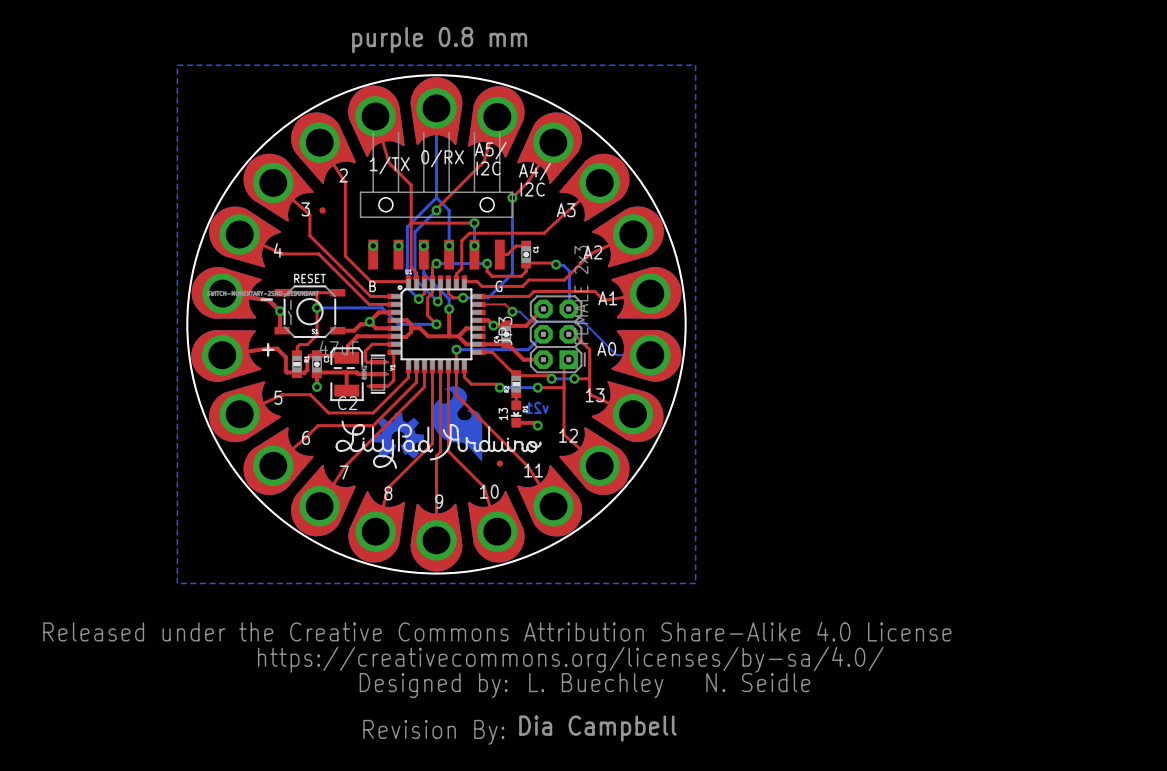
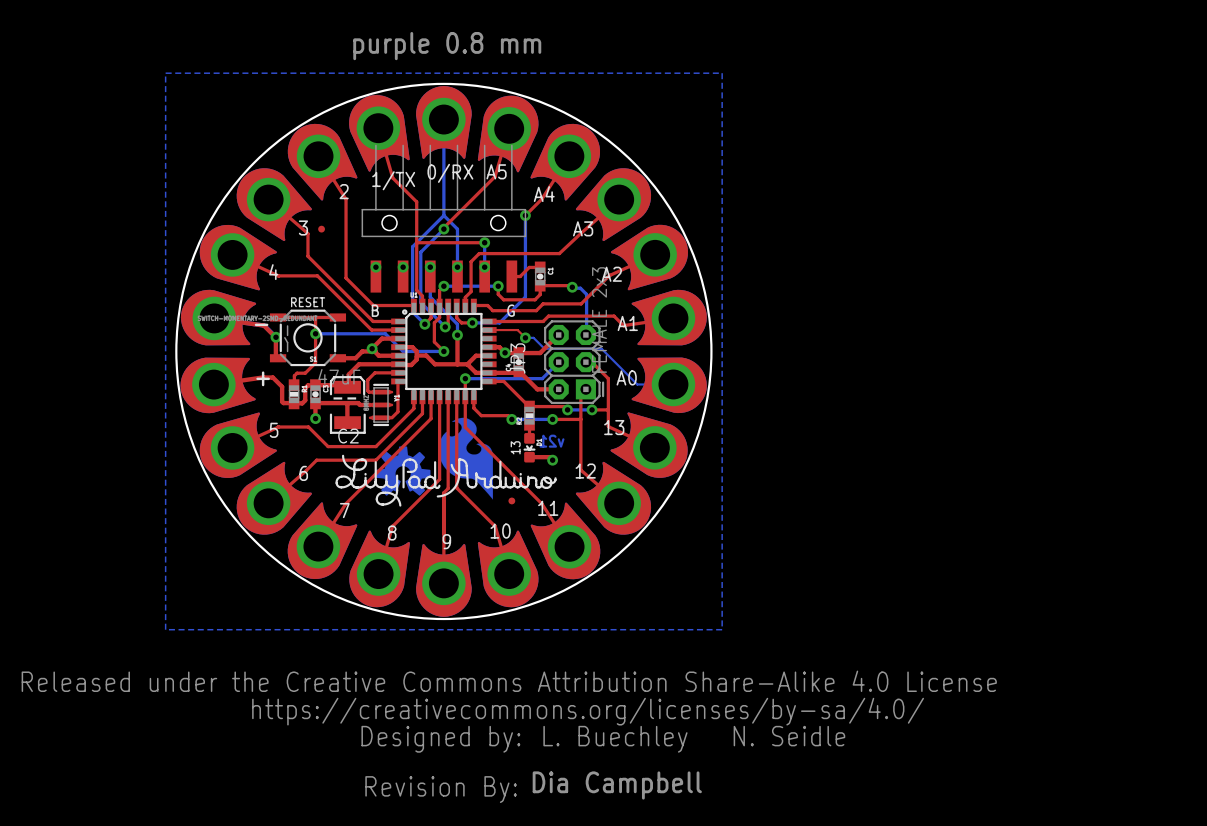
text: A5/ (490, 150) -> A5 (496, 171)
text: I2C (488, 168) -> none
text: A4/ (534, 171) -> A4 (544, 194)
text: I2C (532, 189) -> none

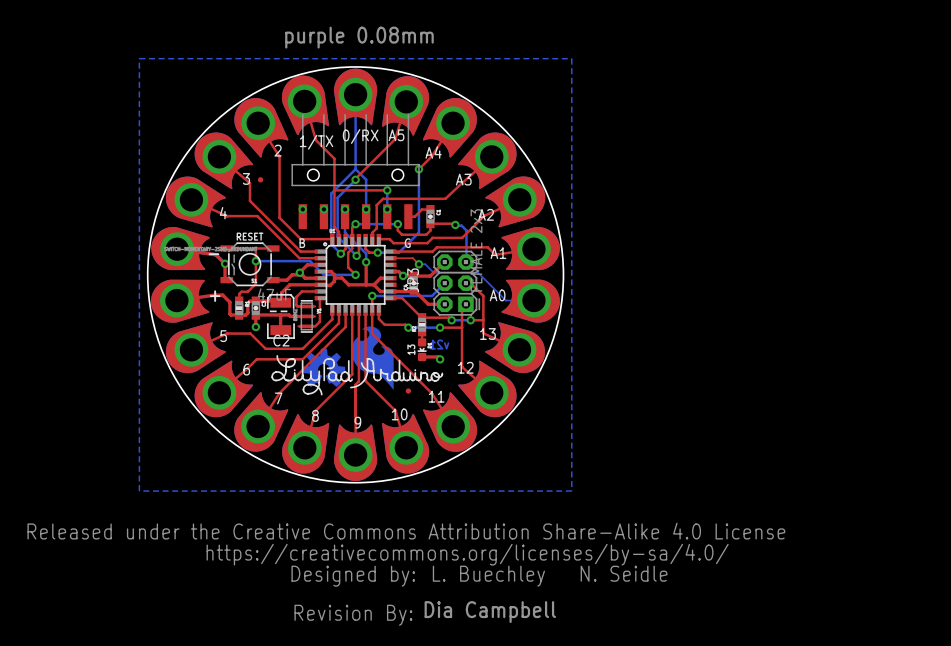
text: purple 0.8 mm (447, 46) -> purple 0.08mm (359, 37)

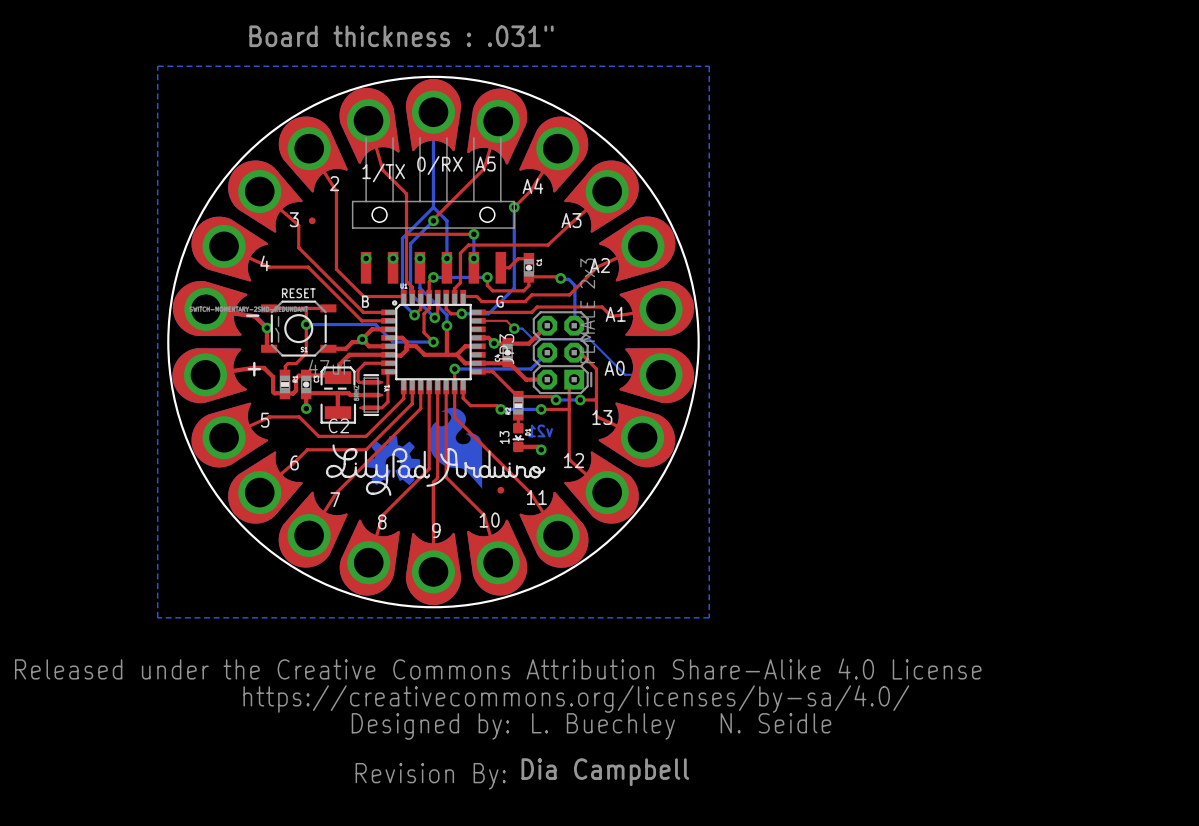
text: none -> Board thickness : .031" (401, 36)
text: purple 0.08mm (359, 37) -> none

